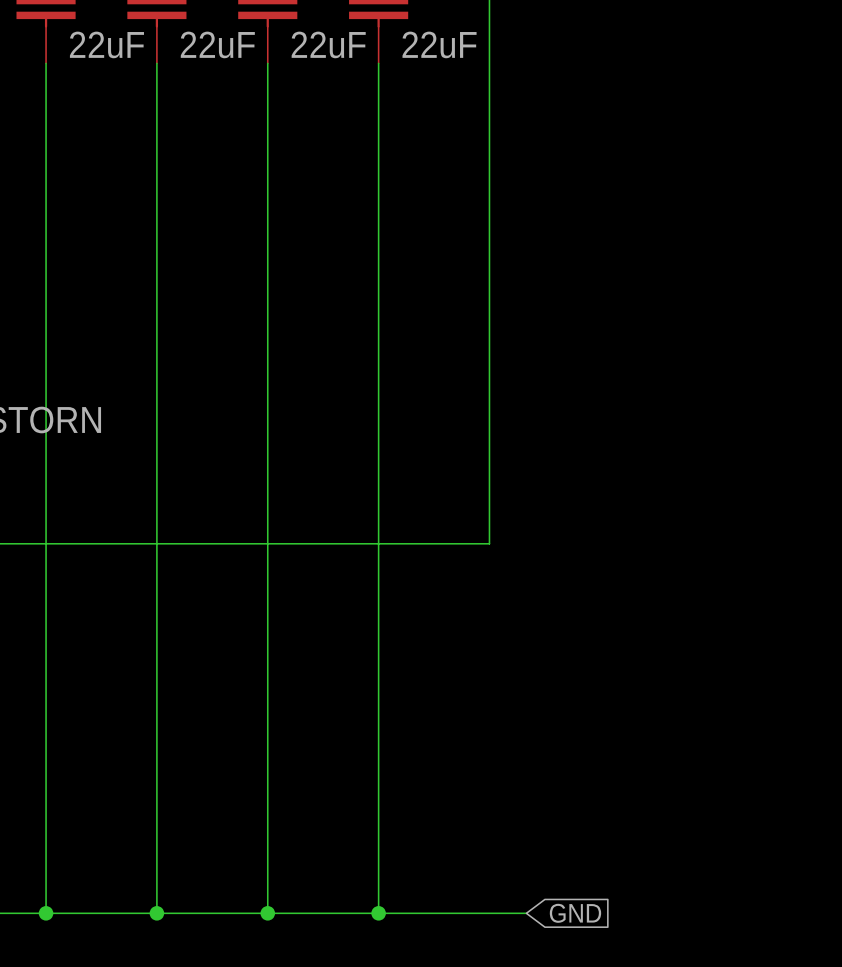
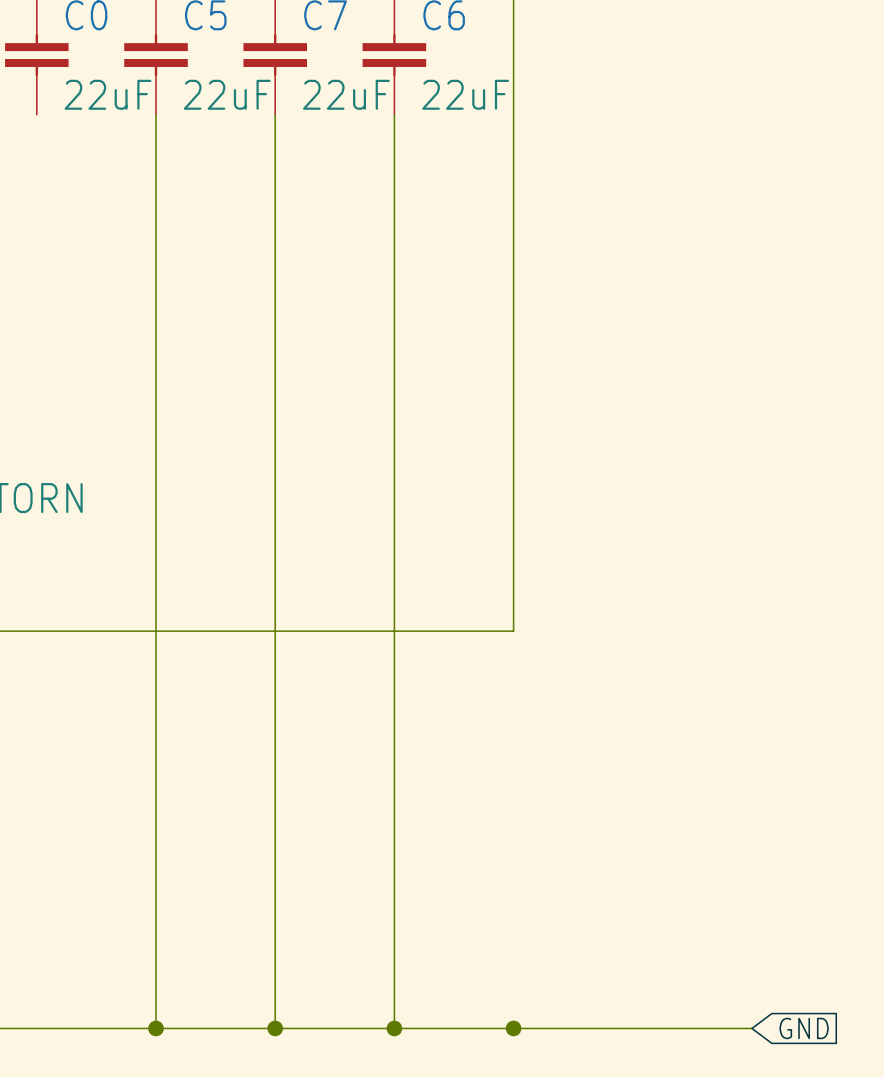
wire: (46, 63) (46, 913) -> none
junction: (46, 913) -> none
junction: none -> (513, 1028)
wire: none -> (553, 1028) (751, 1028)
global label position: GND (575, 913) -> GND (804, 1028)

